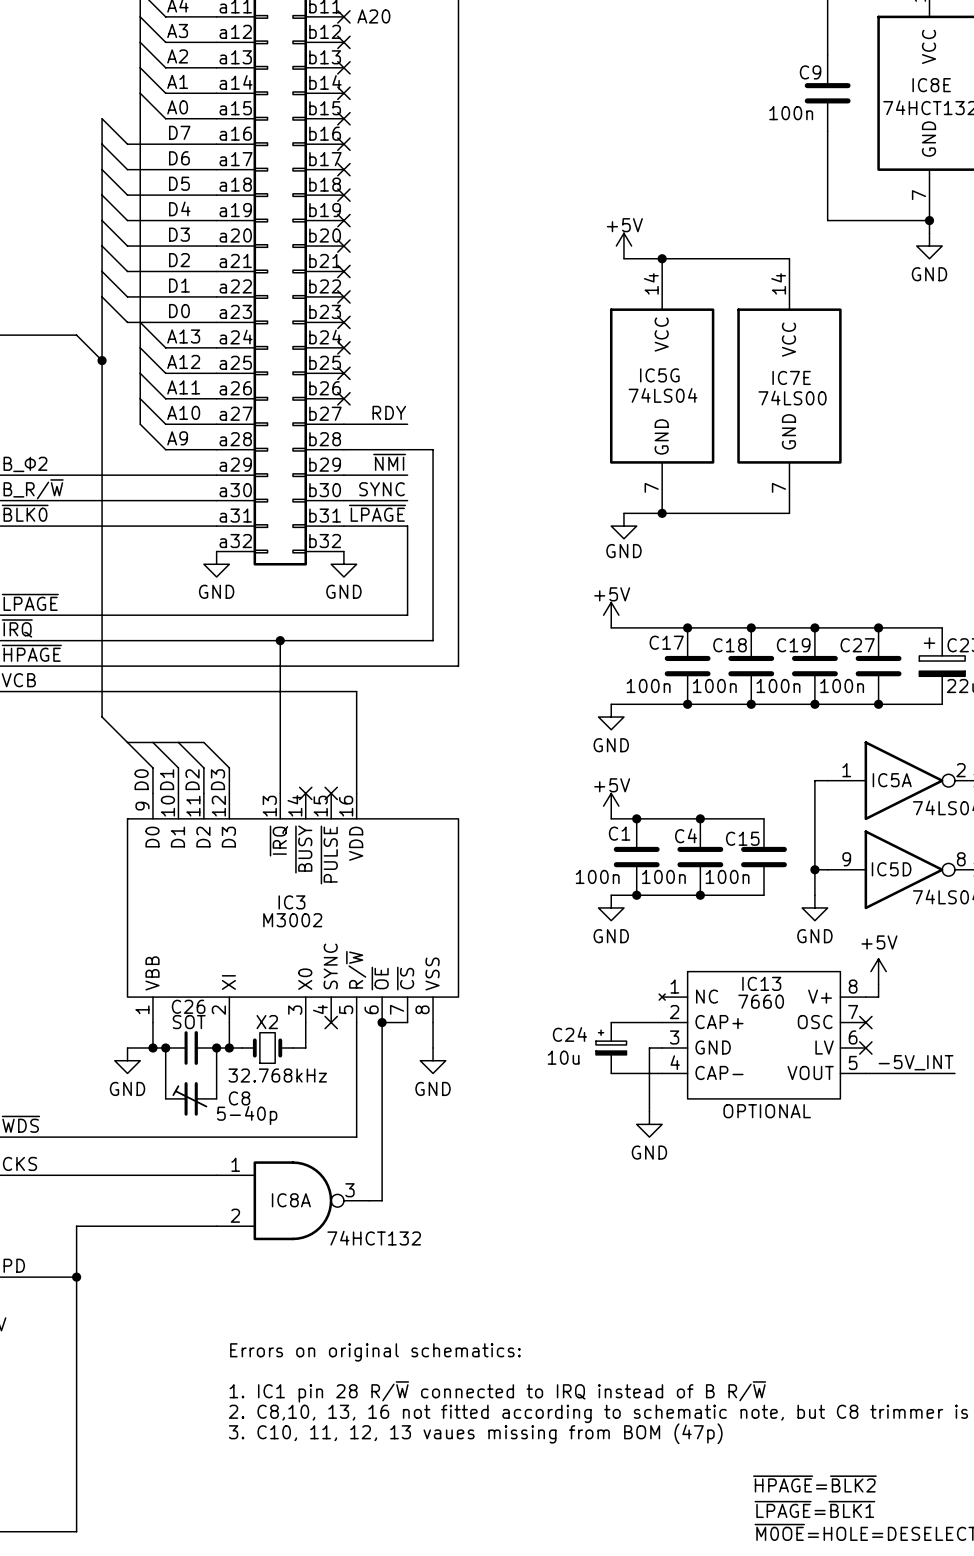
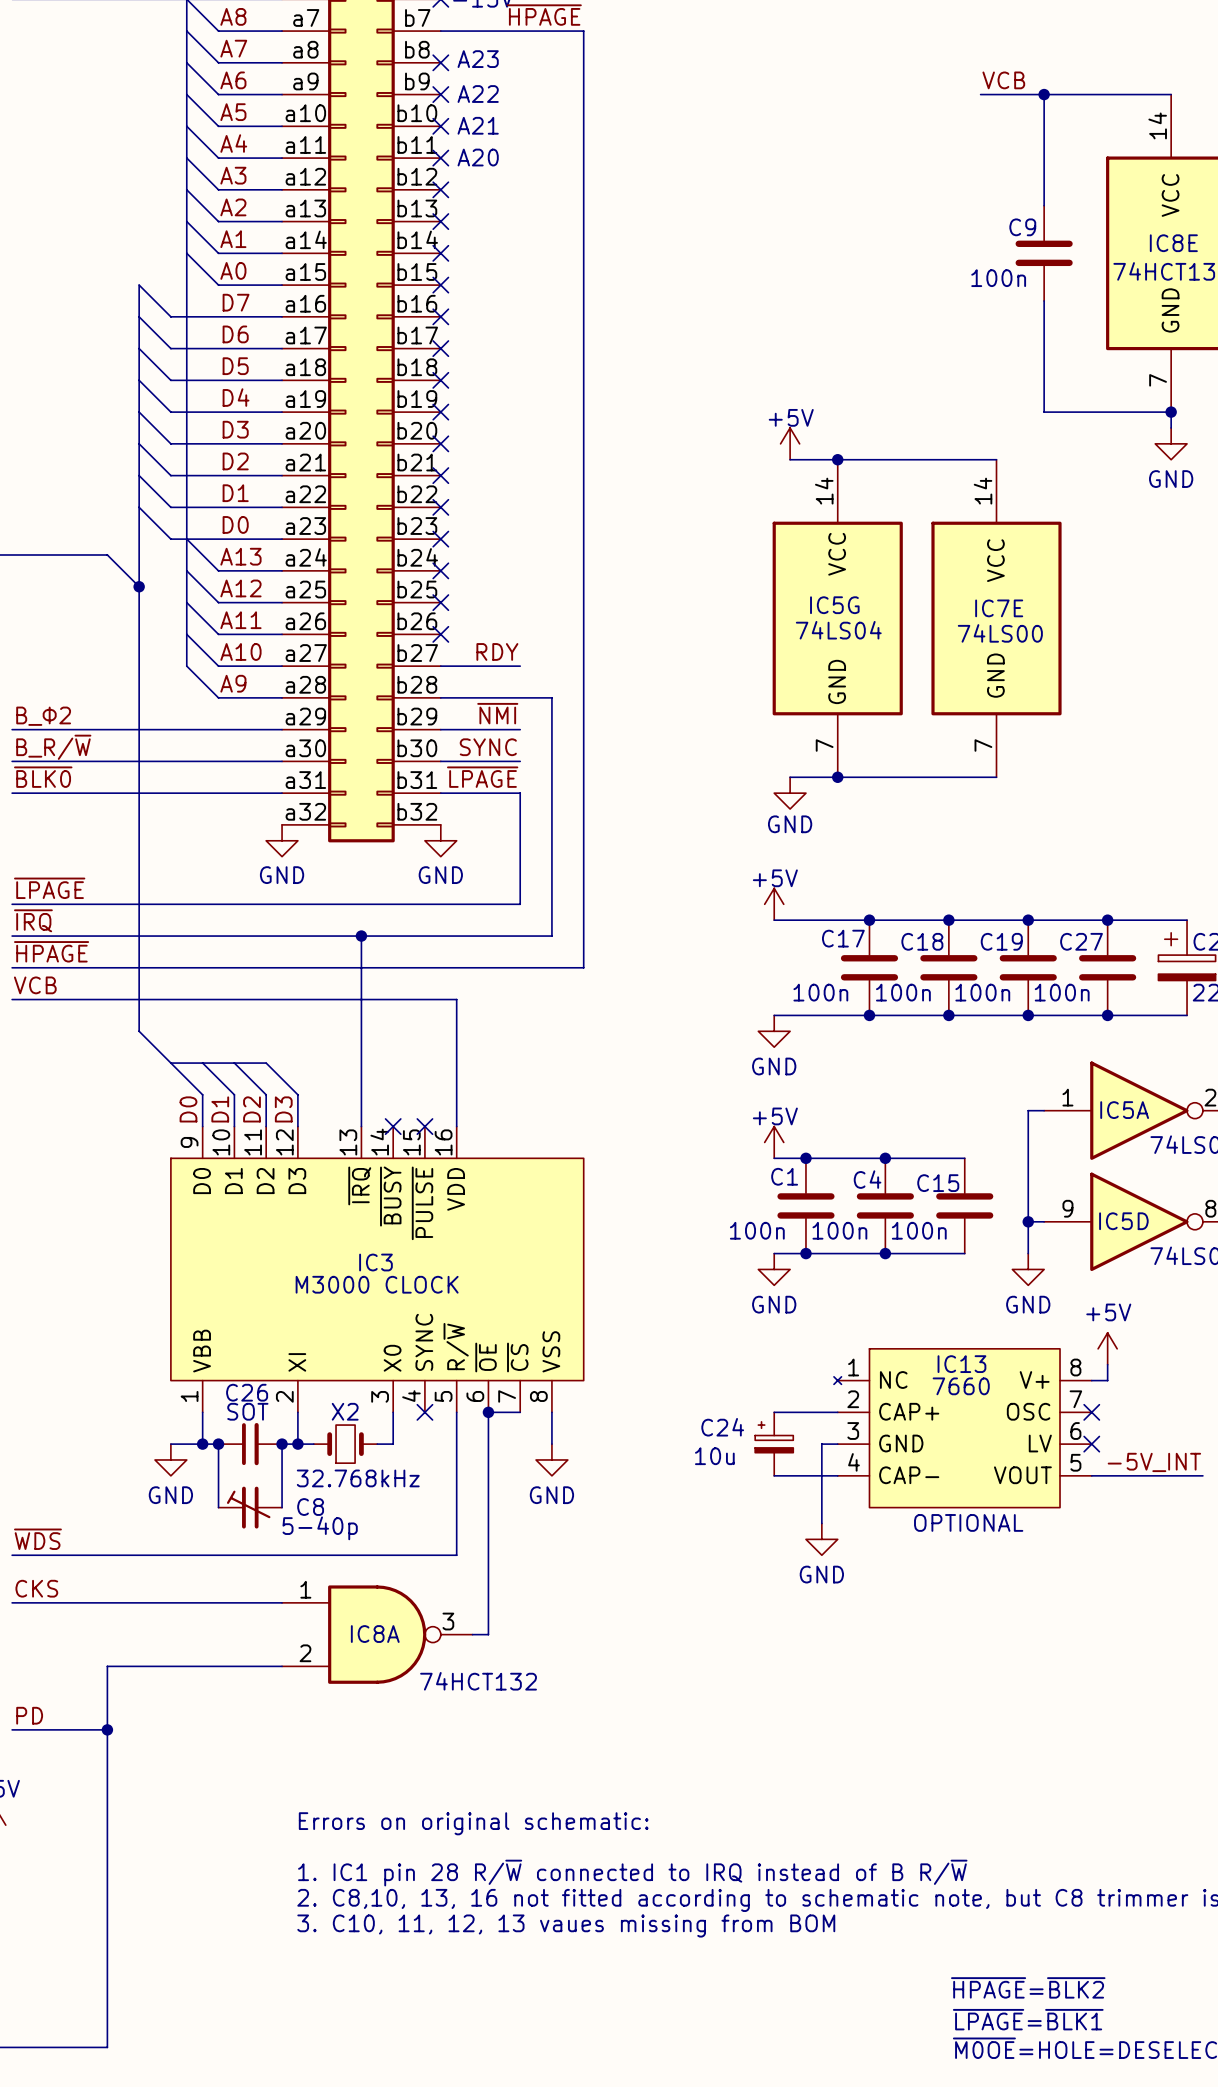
IC3 value: M3002 (292, 920) -> M3000 CLOCK (377, 1284)
text: Errors on original schematics: (375, 1352) -> Errors on original schematic: (473, 1823)
text: 3. C10, 11, 12, 13 vaues missing from BOM (47p) (475, 1433) -> 3. C10, 11, 12, 13 vaues missing from BOM (566, 1926)

